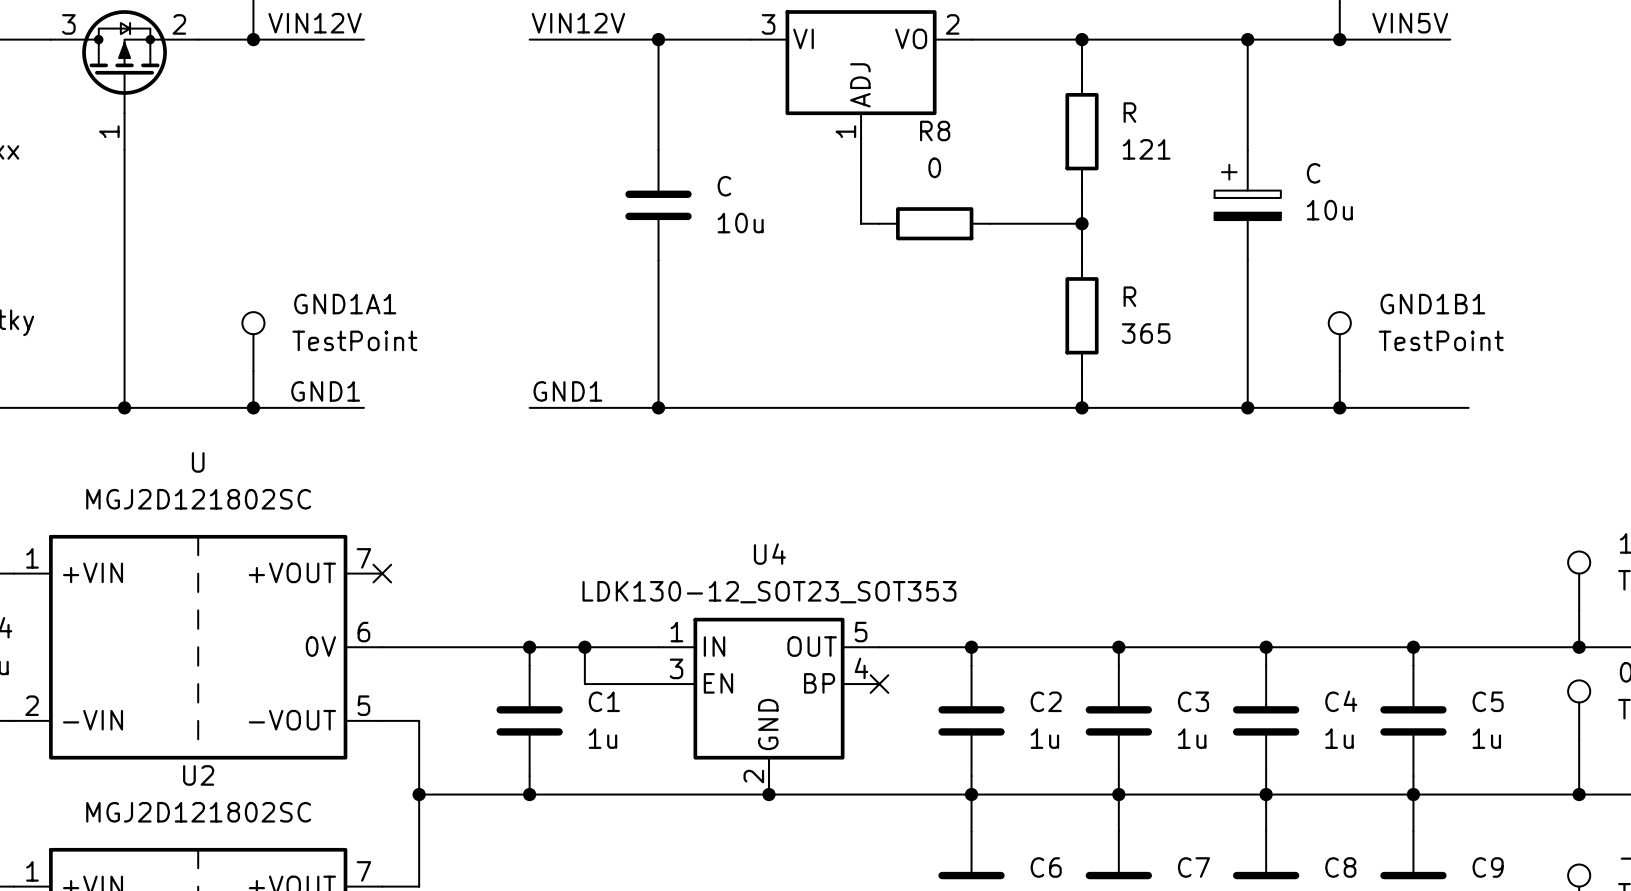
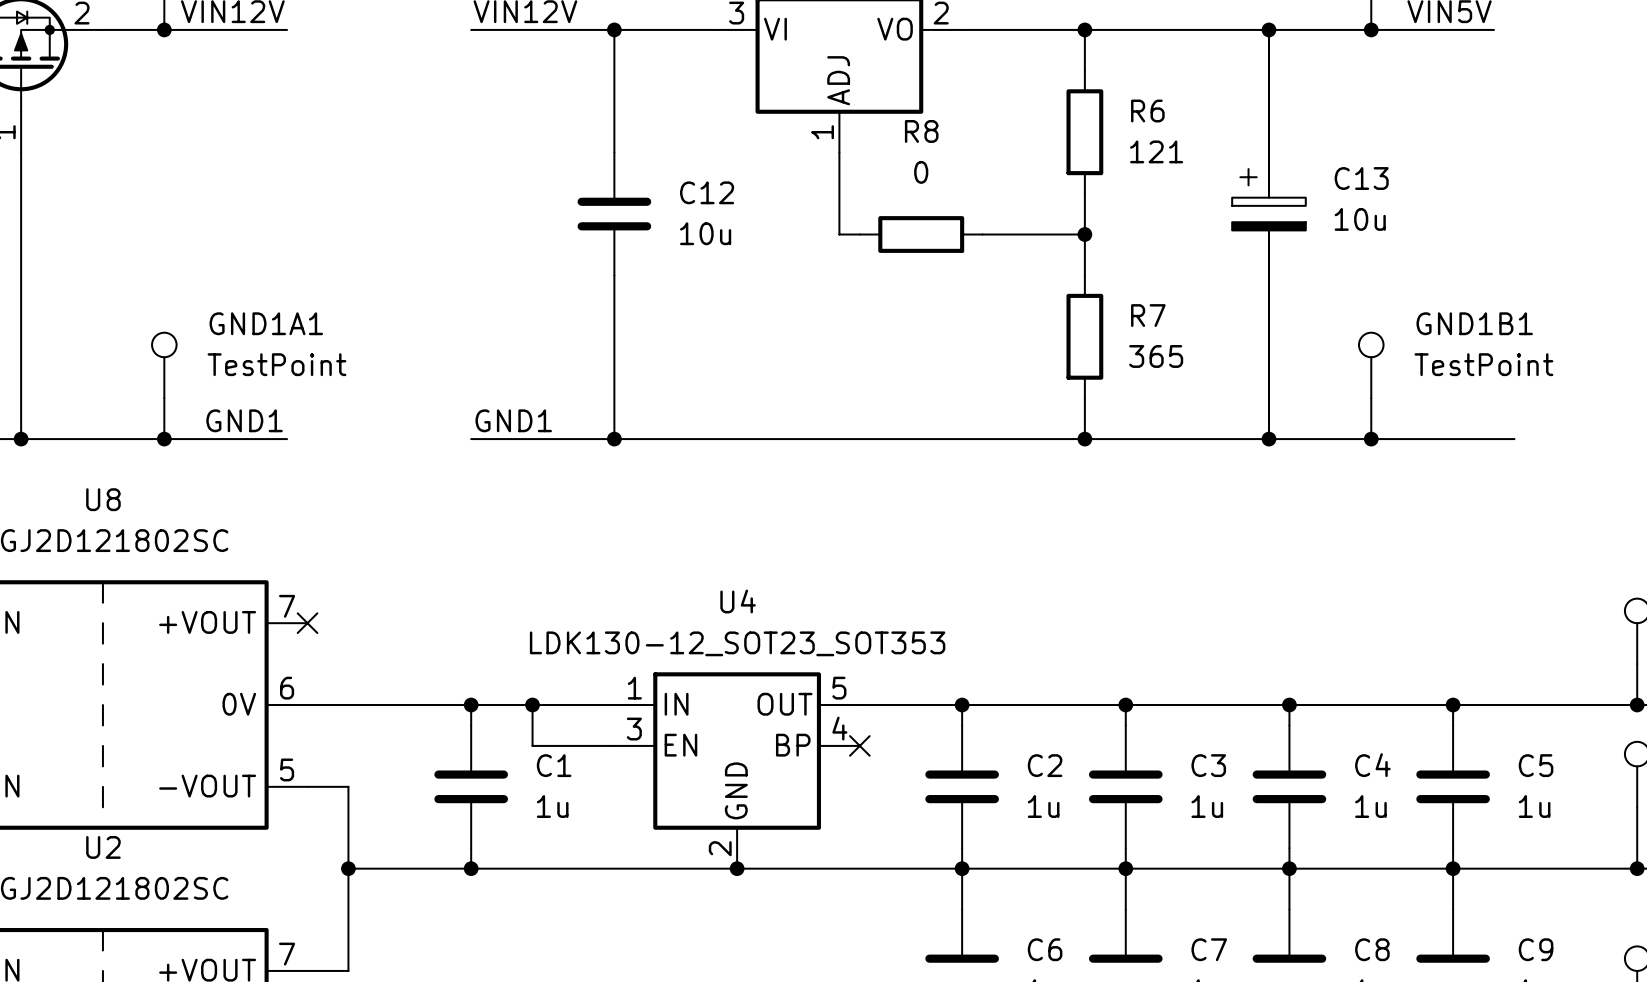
R name: R (1129, 112) -> R6 (1147, 111)
C name: C (1313, 173) -> C13 (1361, 178)
C name: C (724, 186) -> C12 (707, 192)
R name: R (1129, 296) -> R7 (1148, 315)
U name: U (198, 462) -> U8 (103, 499)

